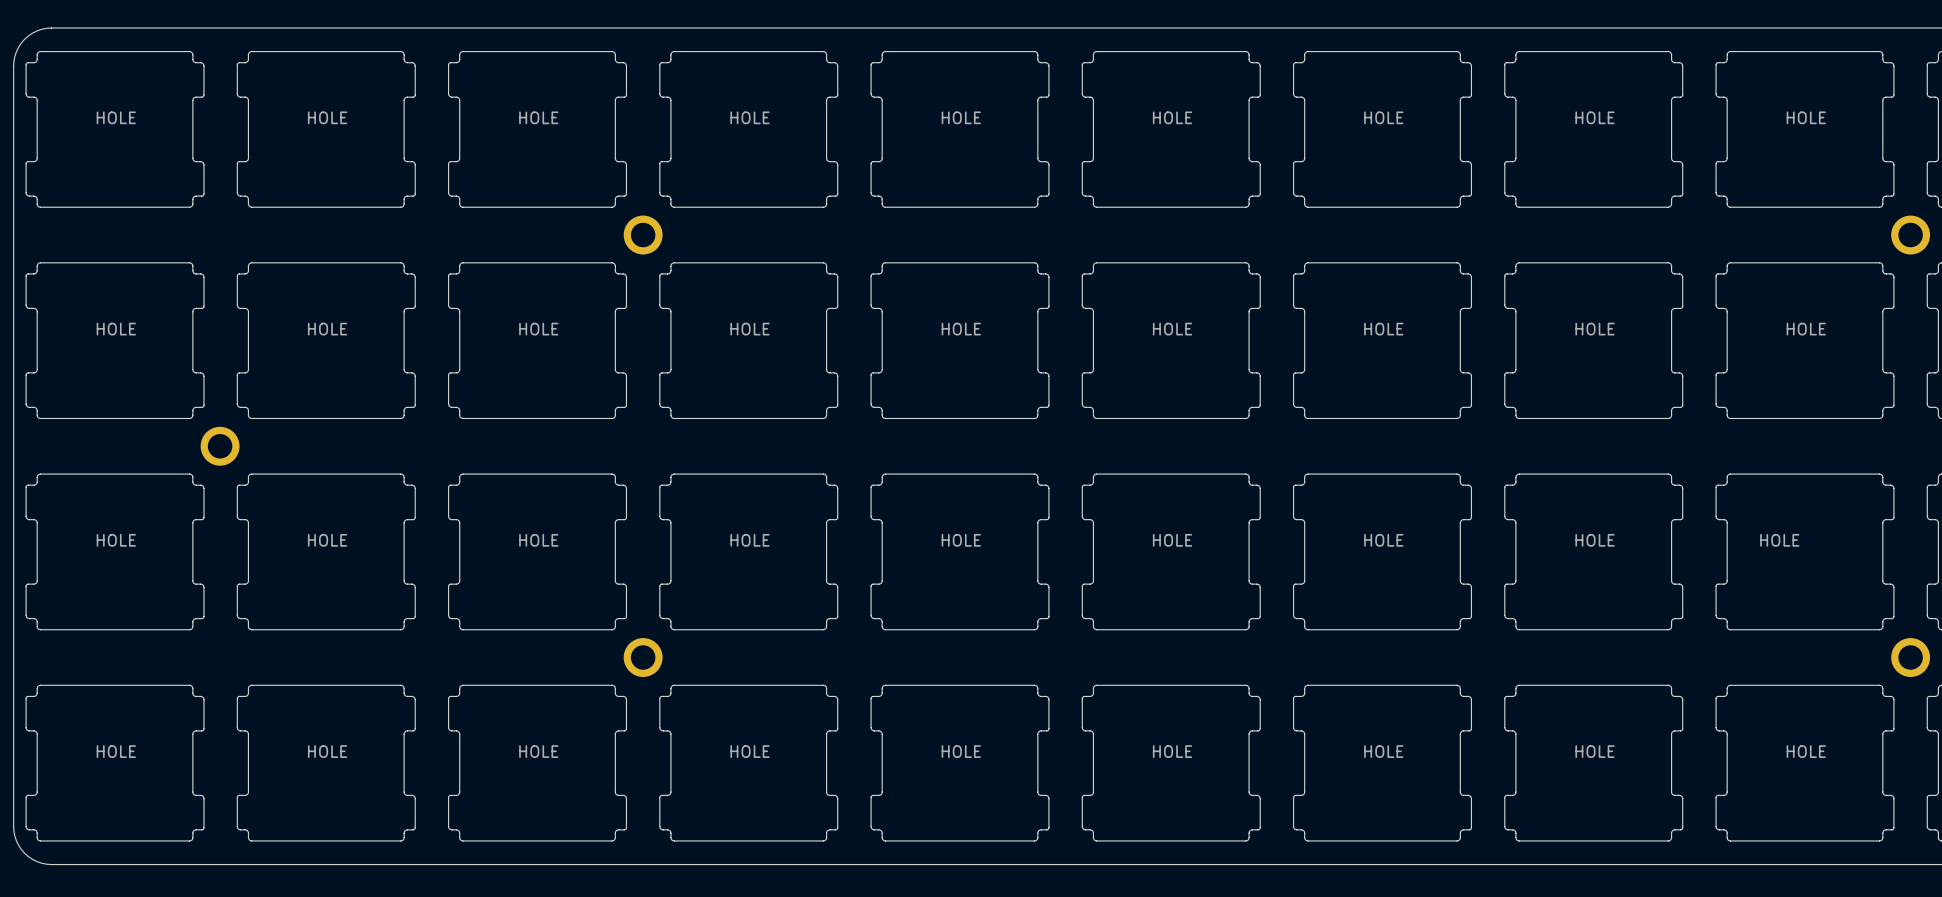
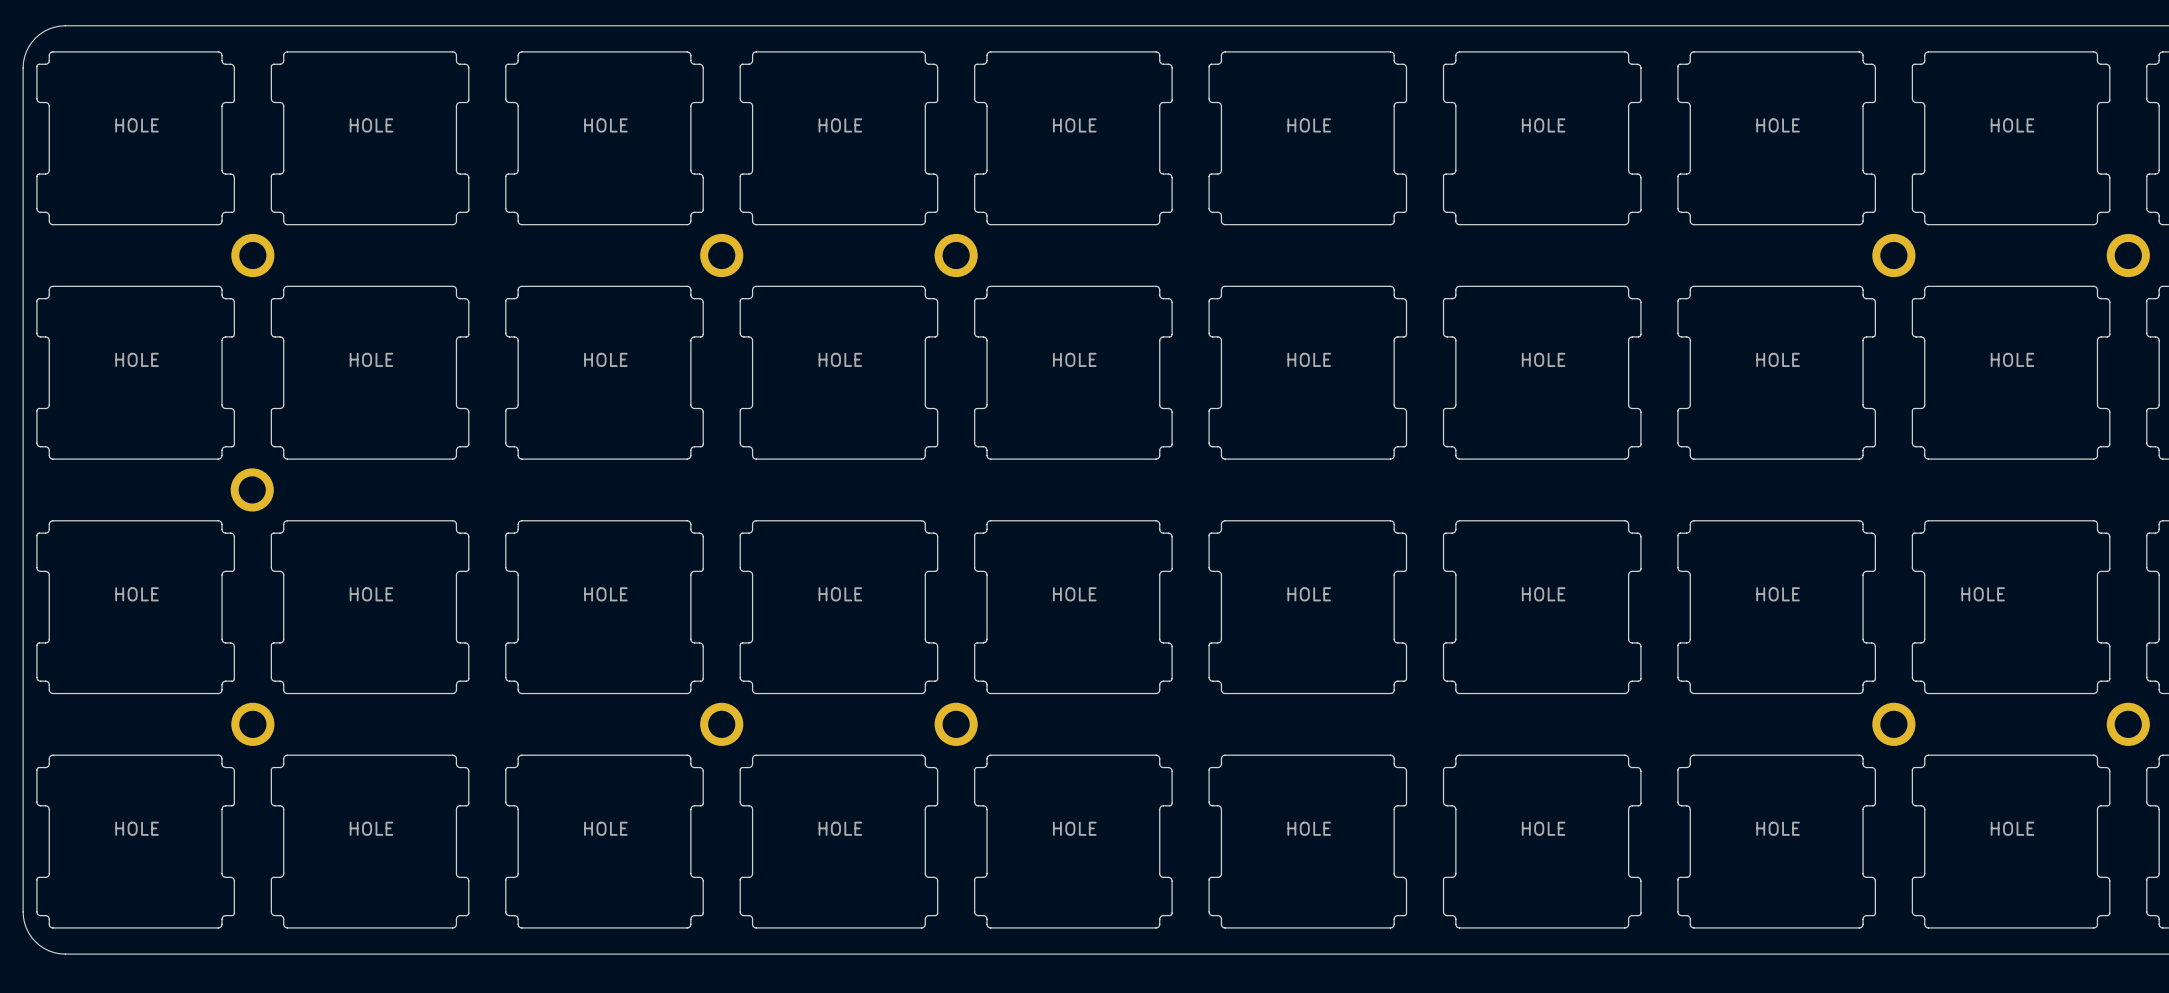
part: none -> (252, 255)
part: none -> (956, 255)
part: none -> (1893, 255)
part: none -> (252, 724)
part: none -> (956, 724)
part: none -> (1893, 724)

